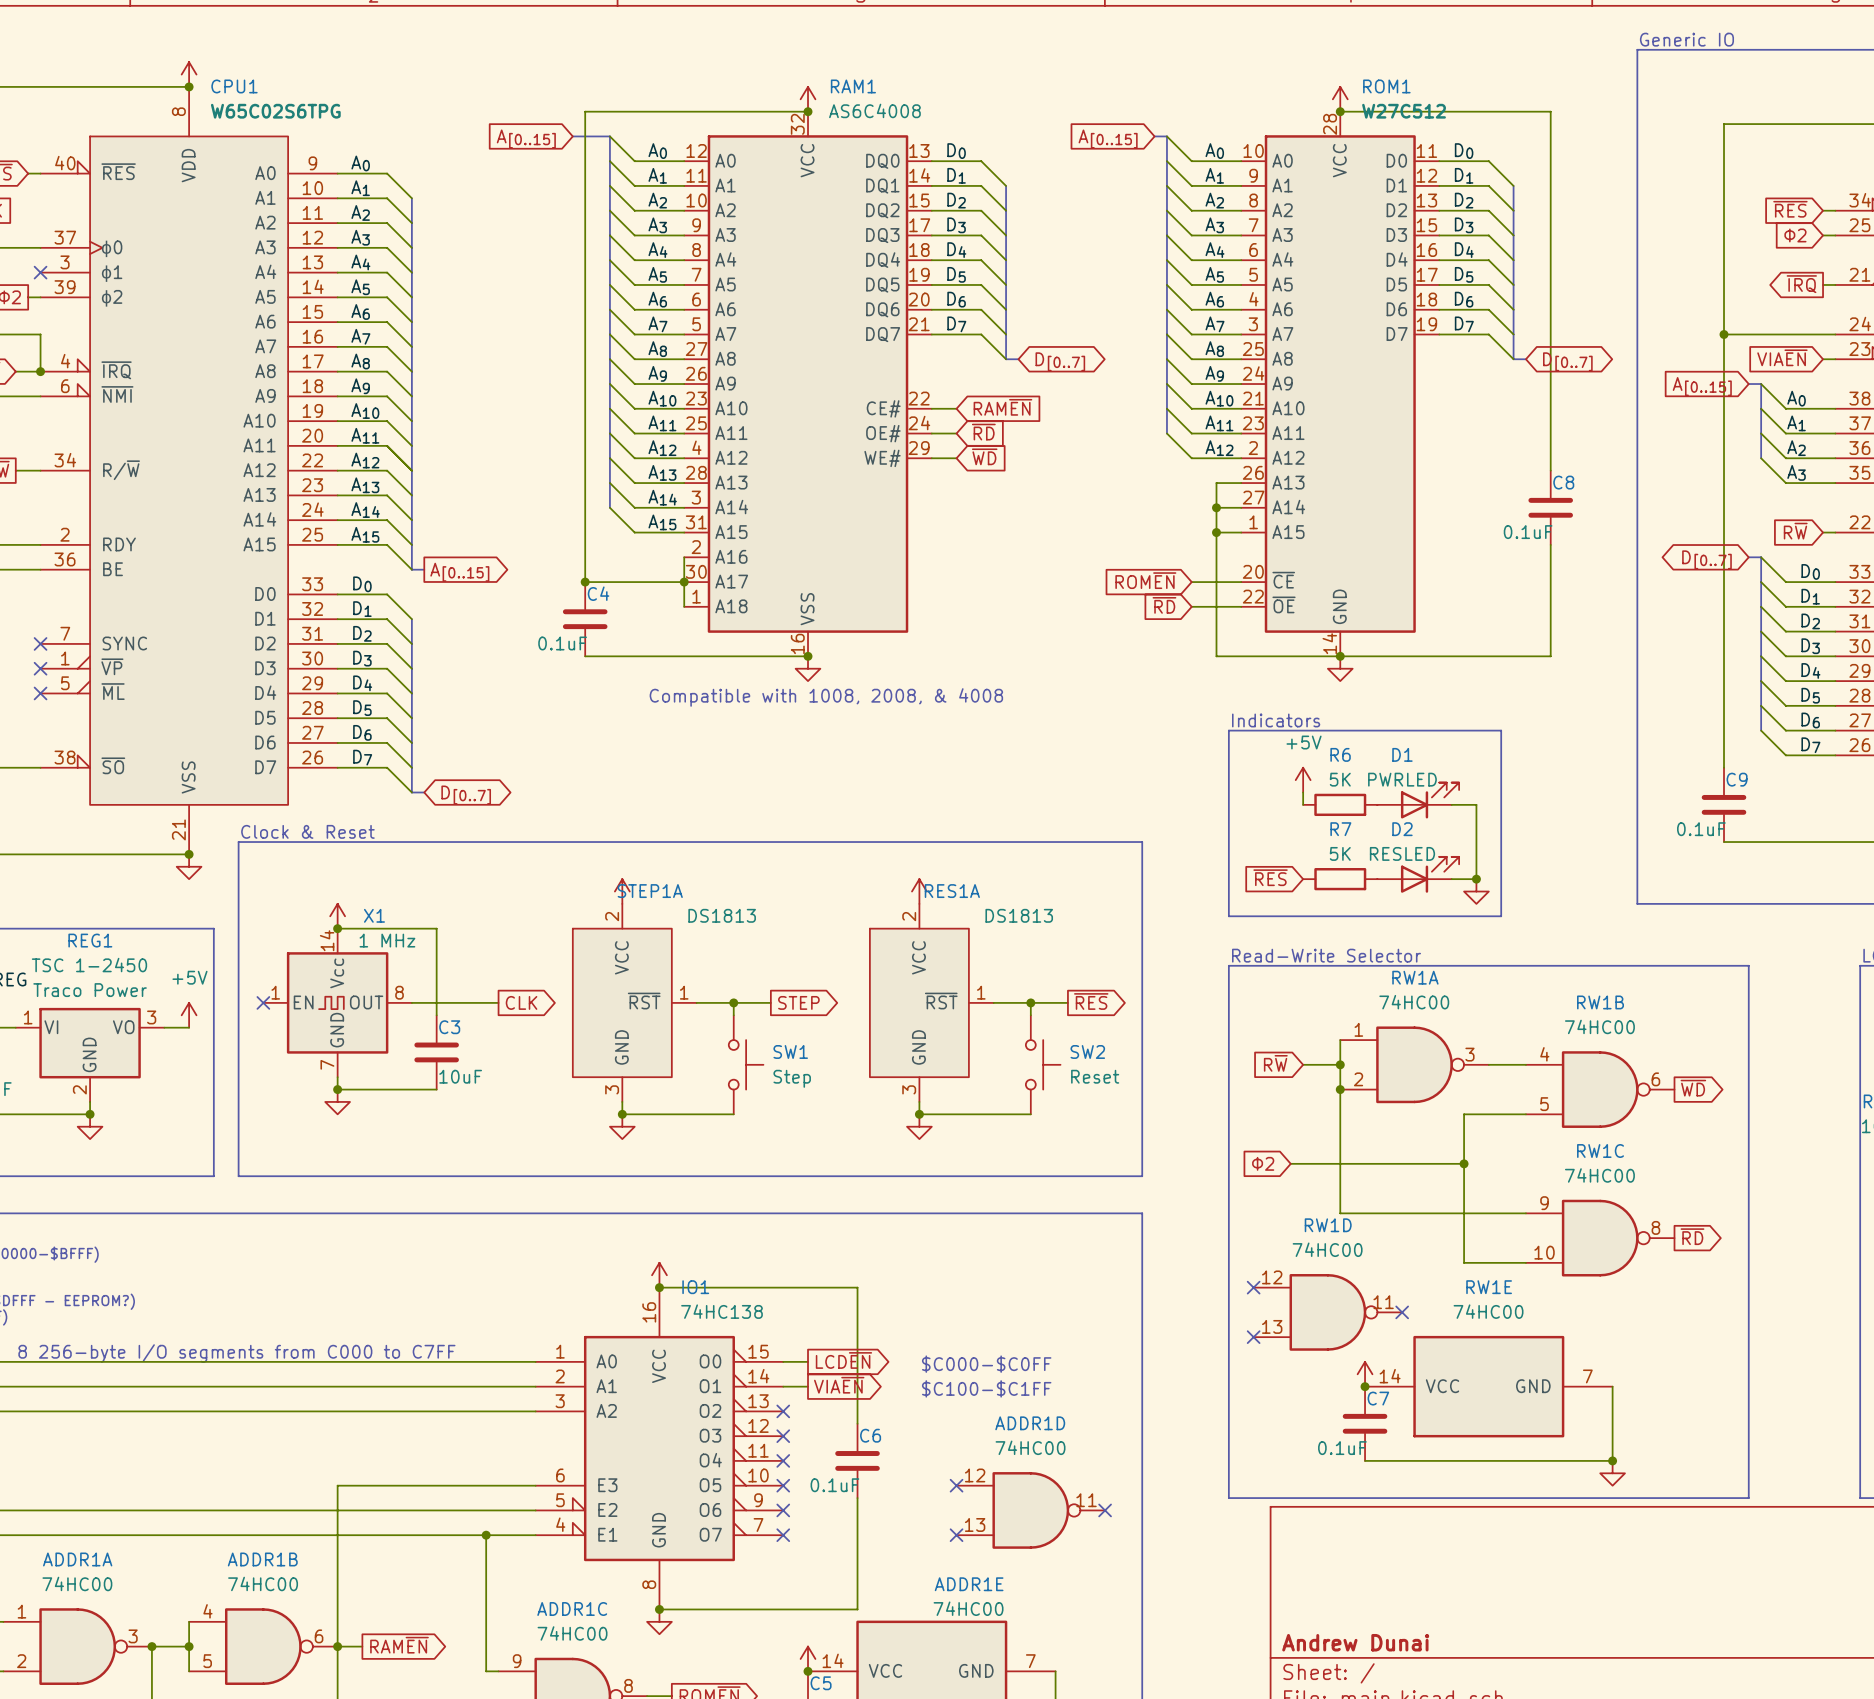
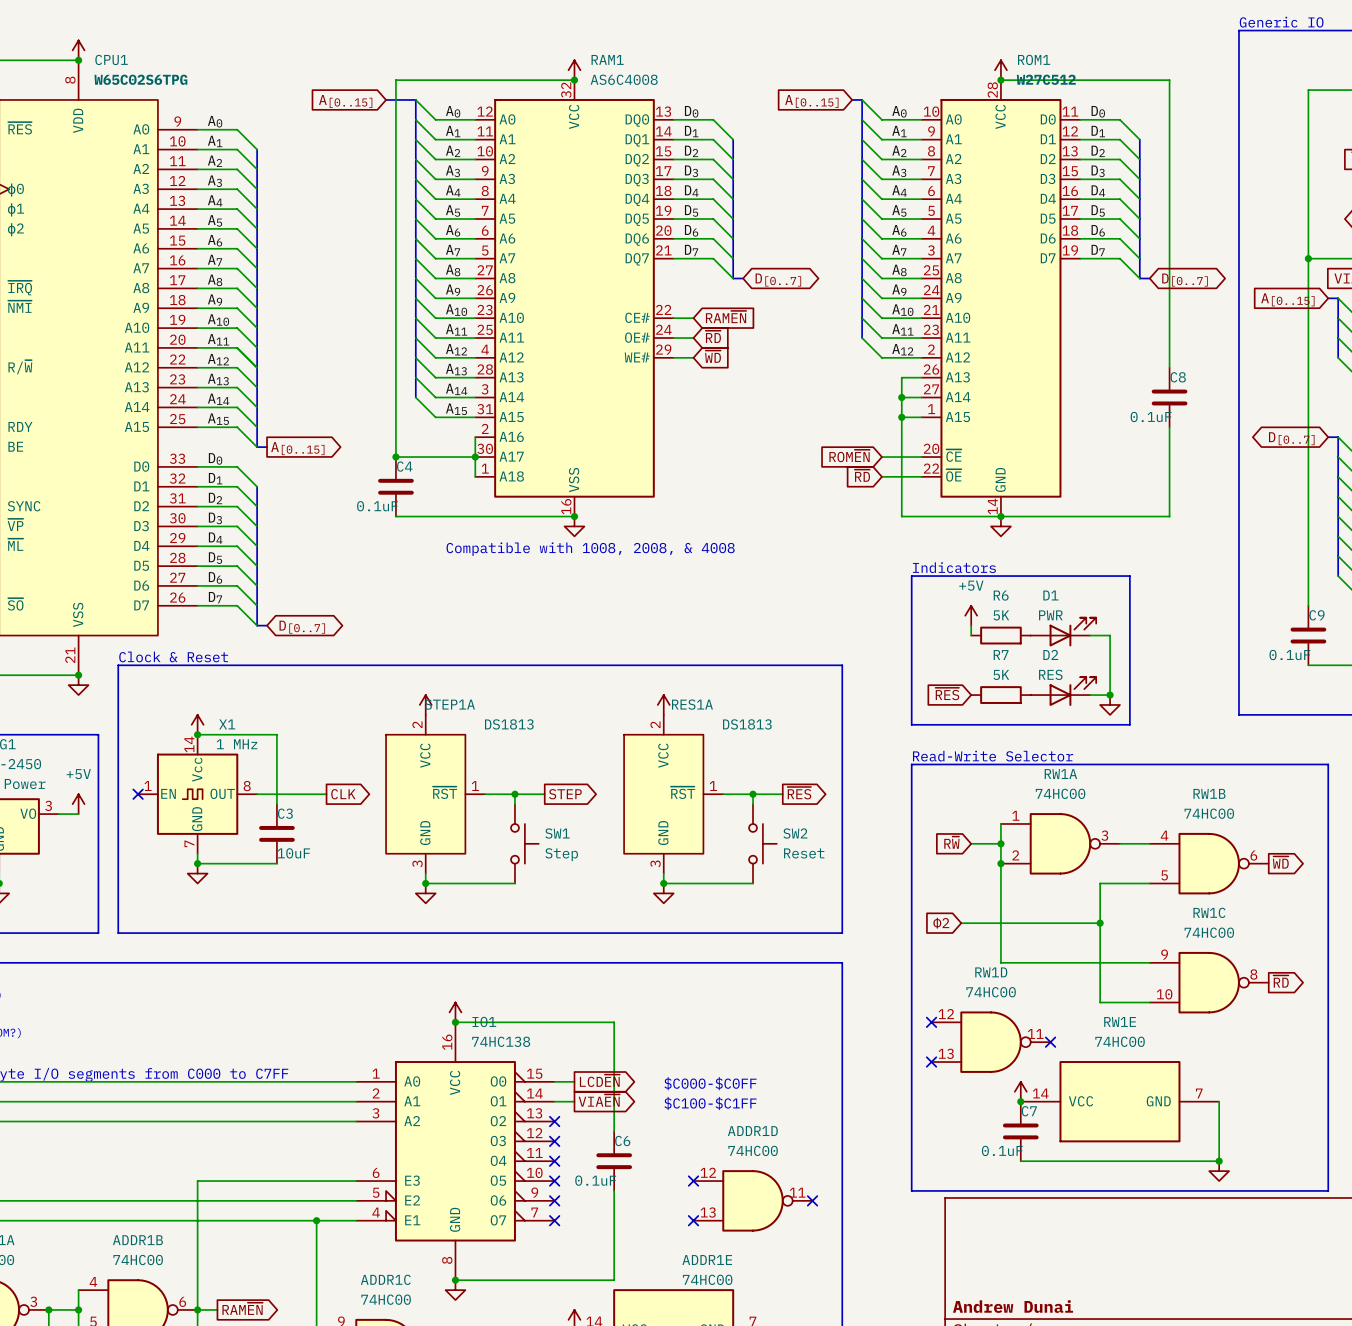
D1 value: PWRLED (1402, 779) -> PWR (1050, 615)
D2 value: RESLED (1402, 853) -> RES (1050, 674)

